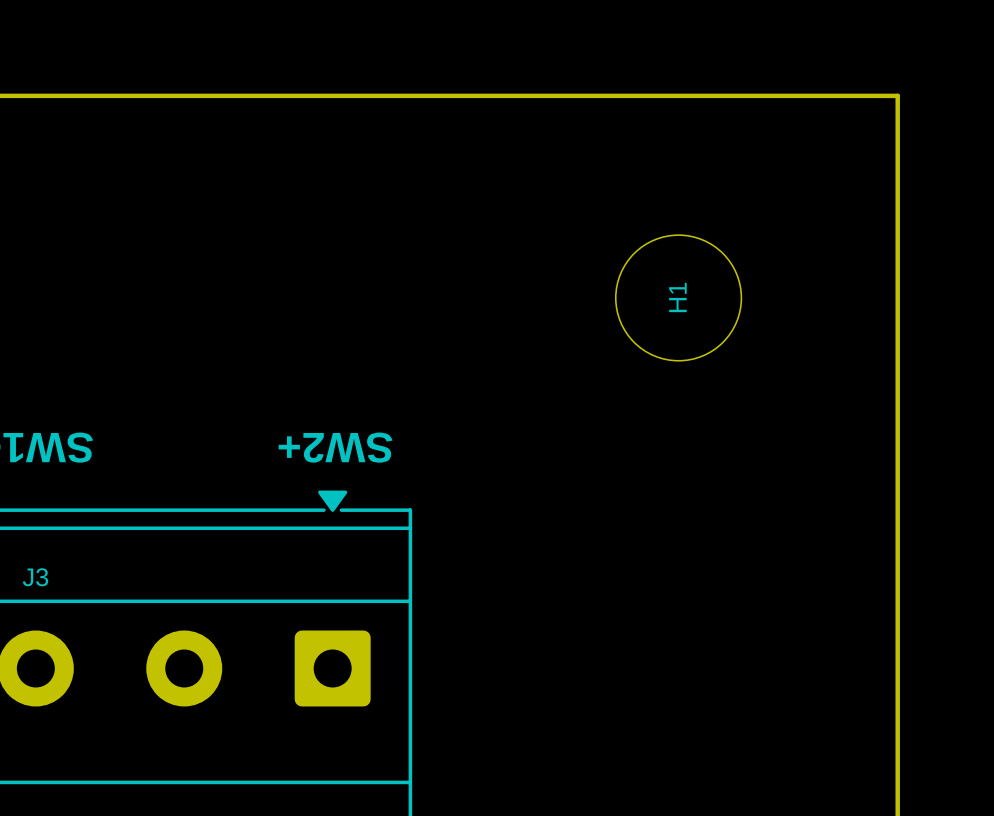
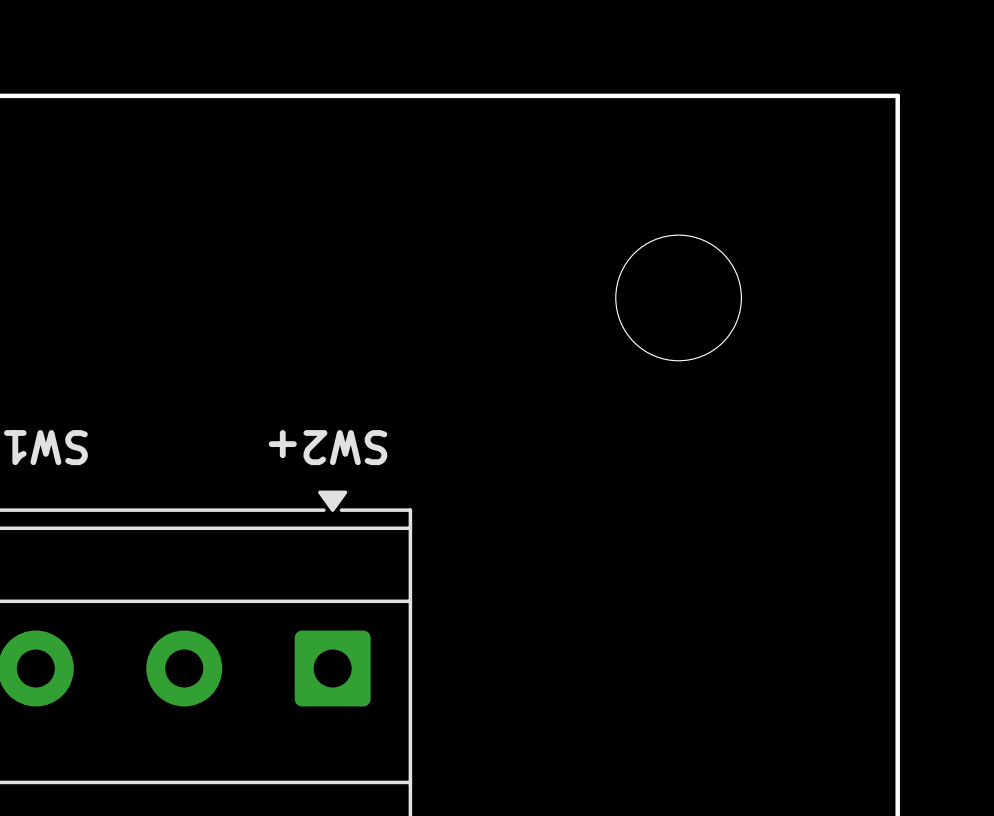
H1 name: H1 (677, 297) -> none
J3 name: J3 (35, 577) -> none

